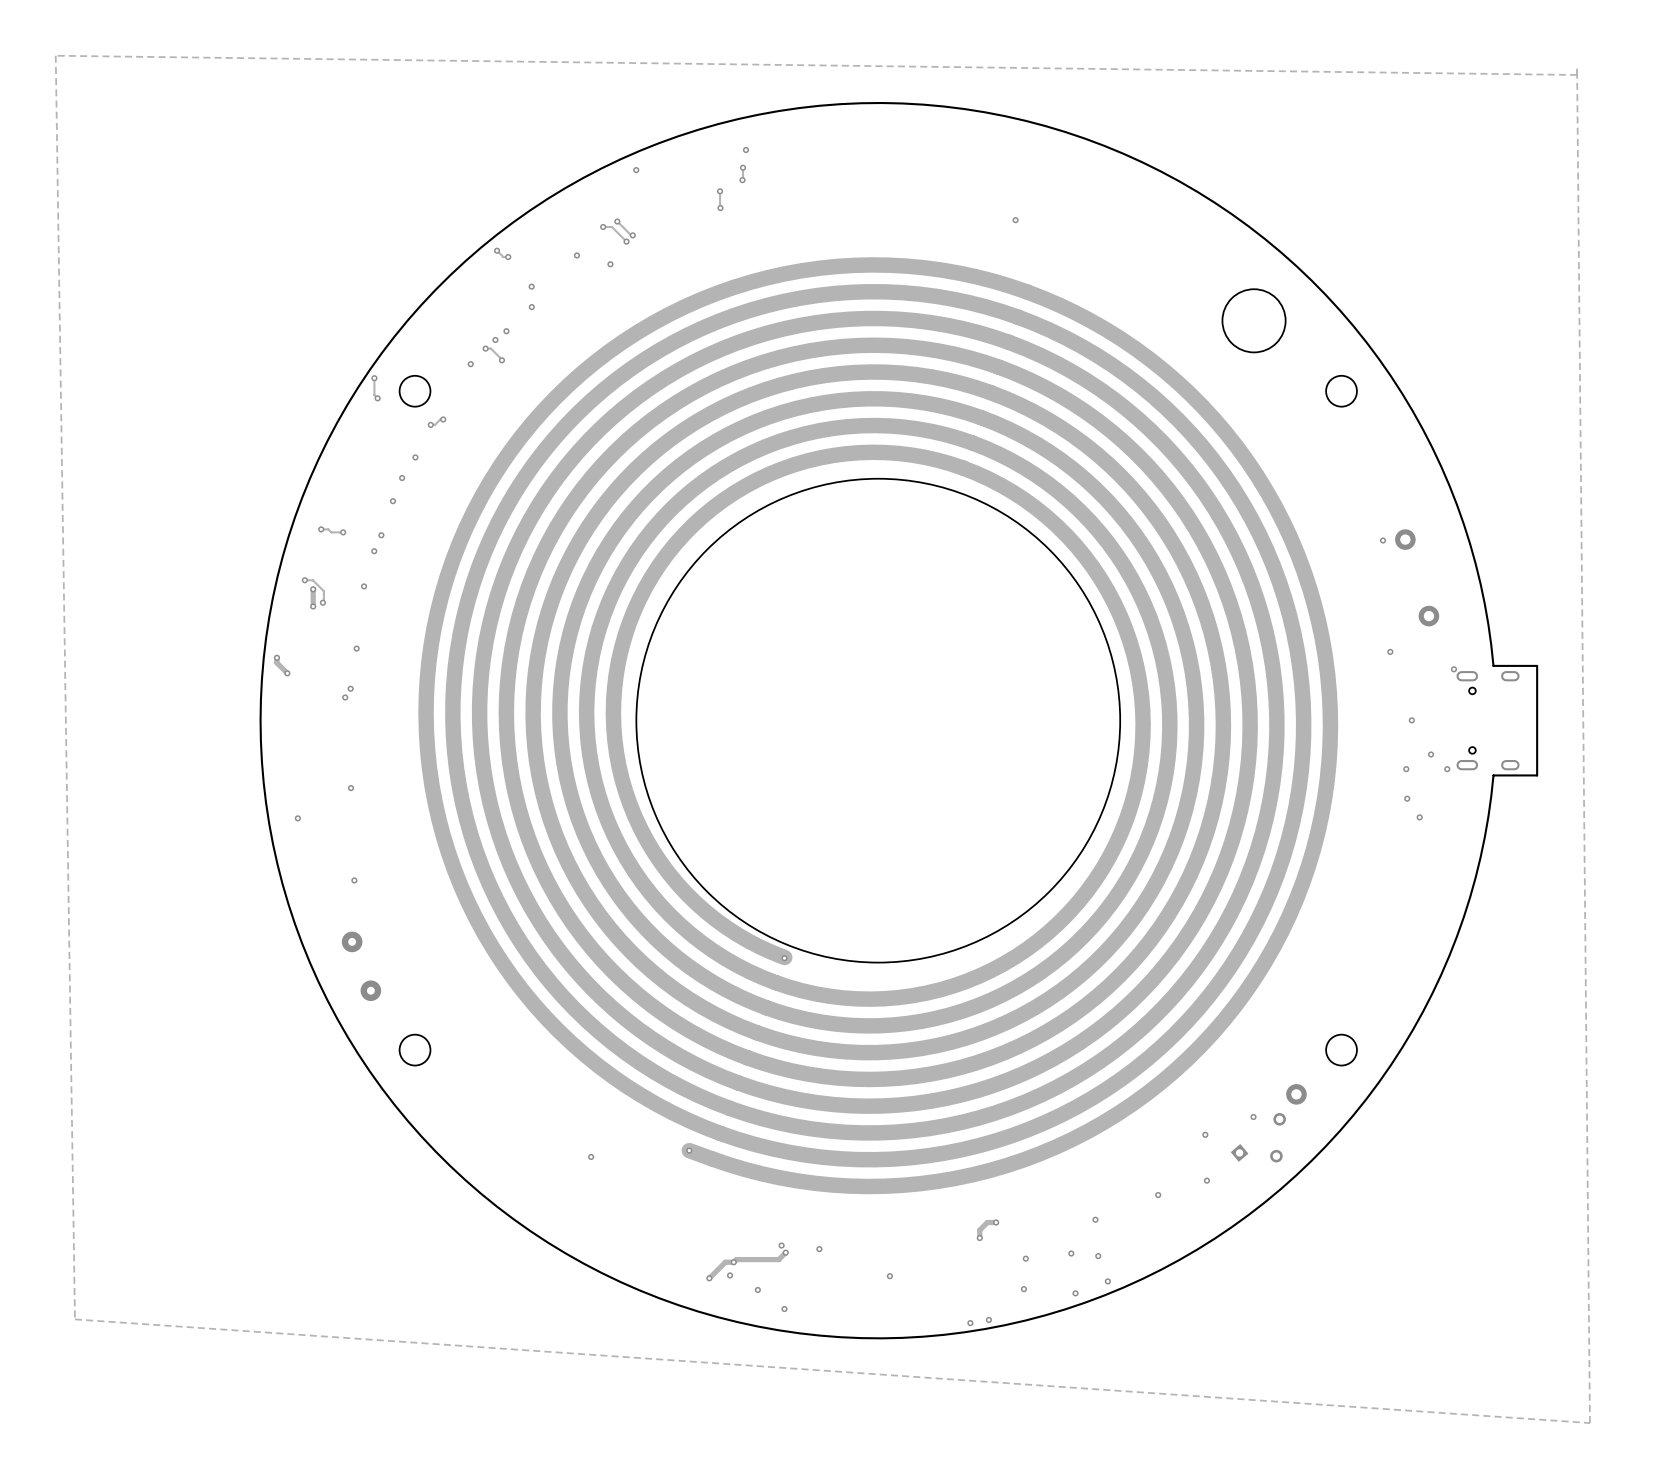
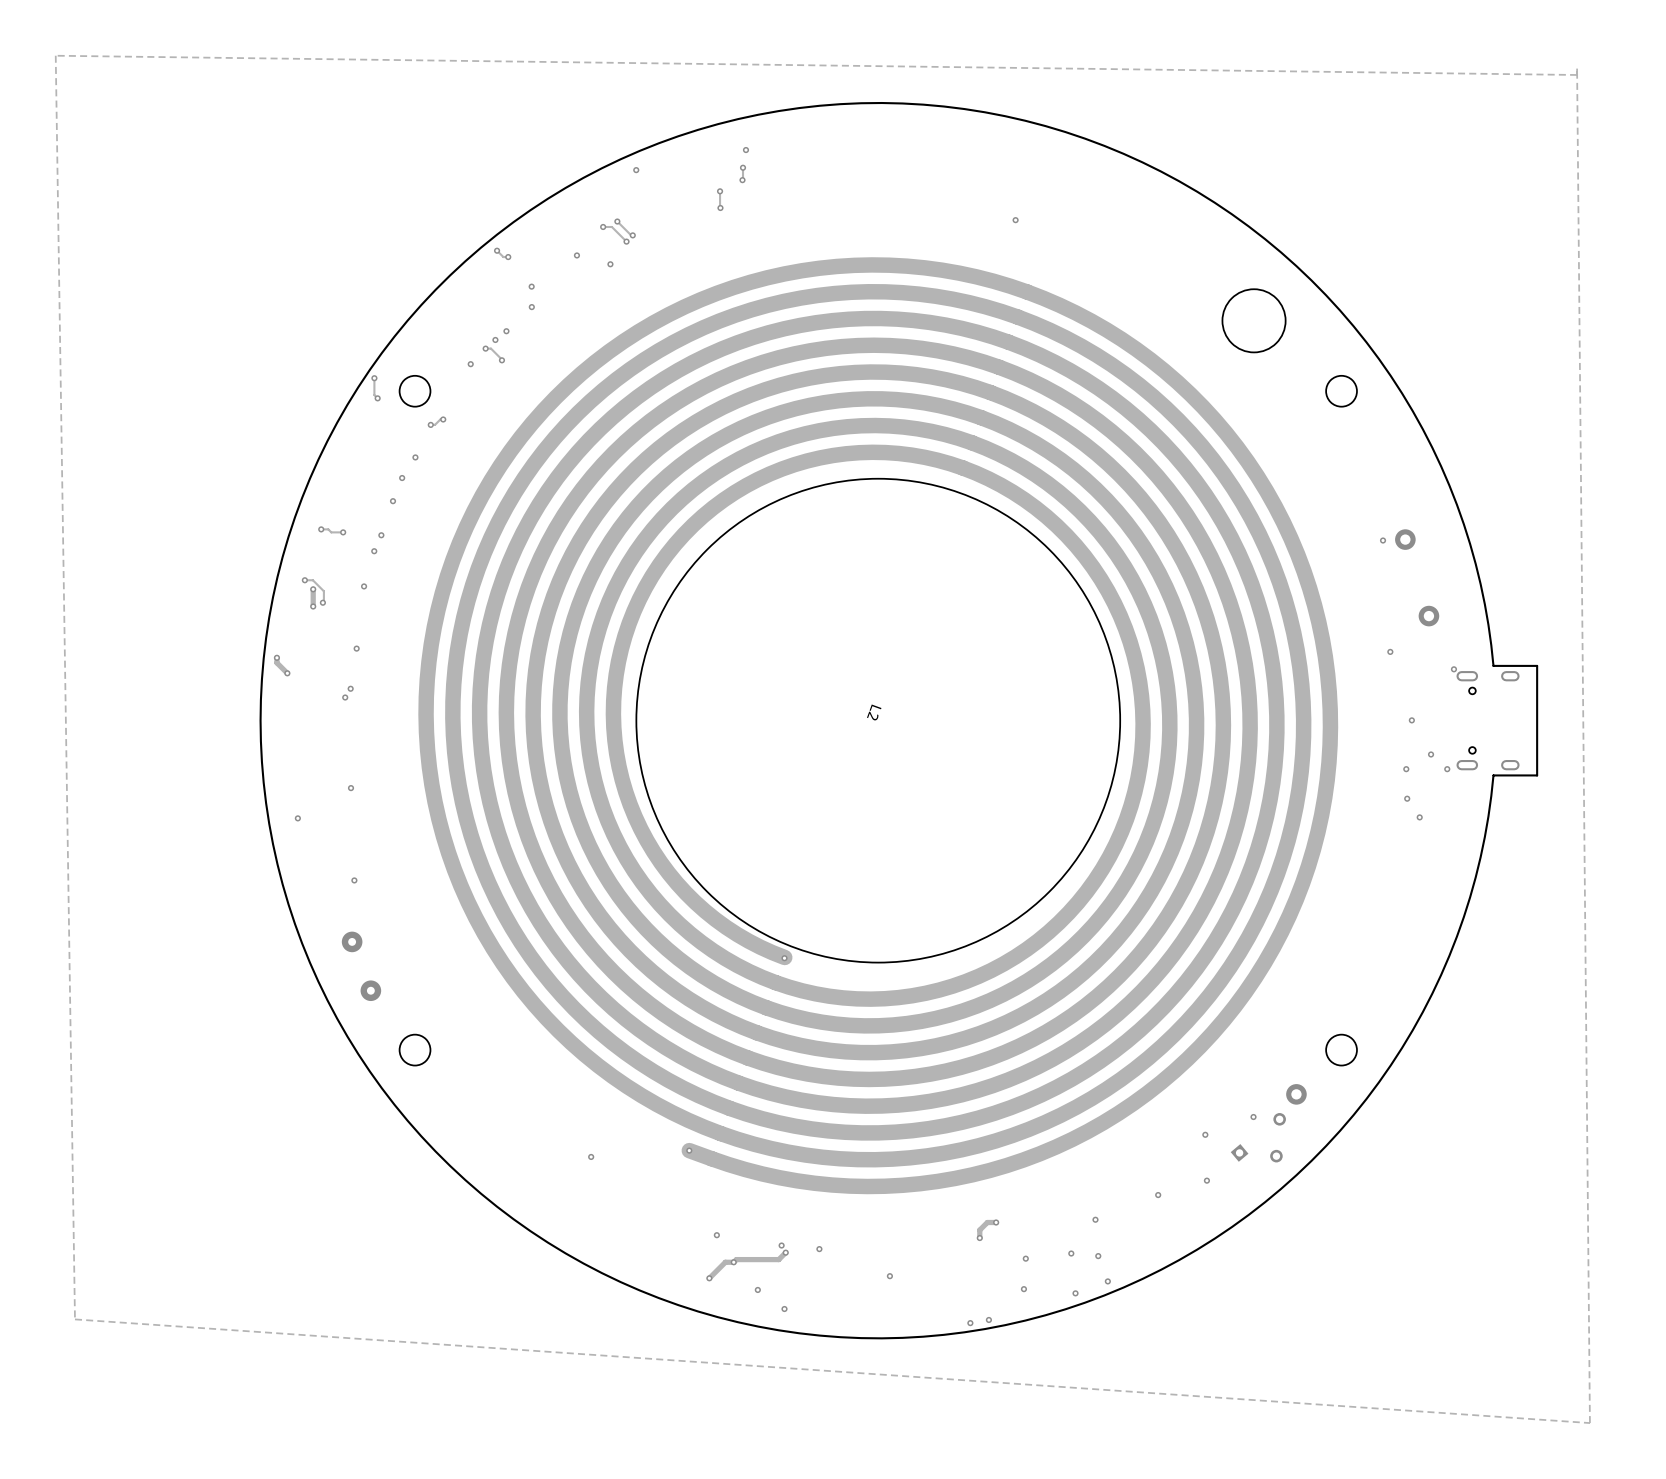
L2 name: none -> L2 (874, 712)
via position: (730, 1275) -> (716, 1235)

